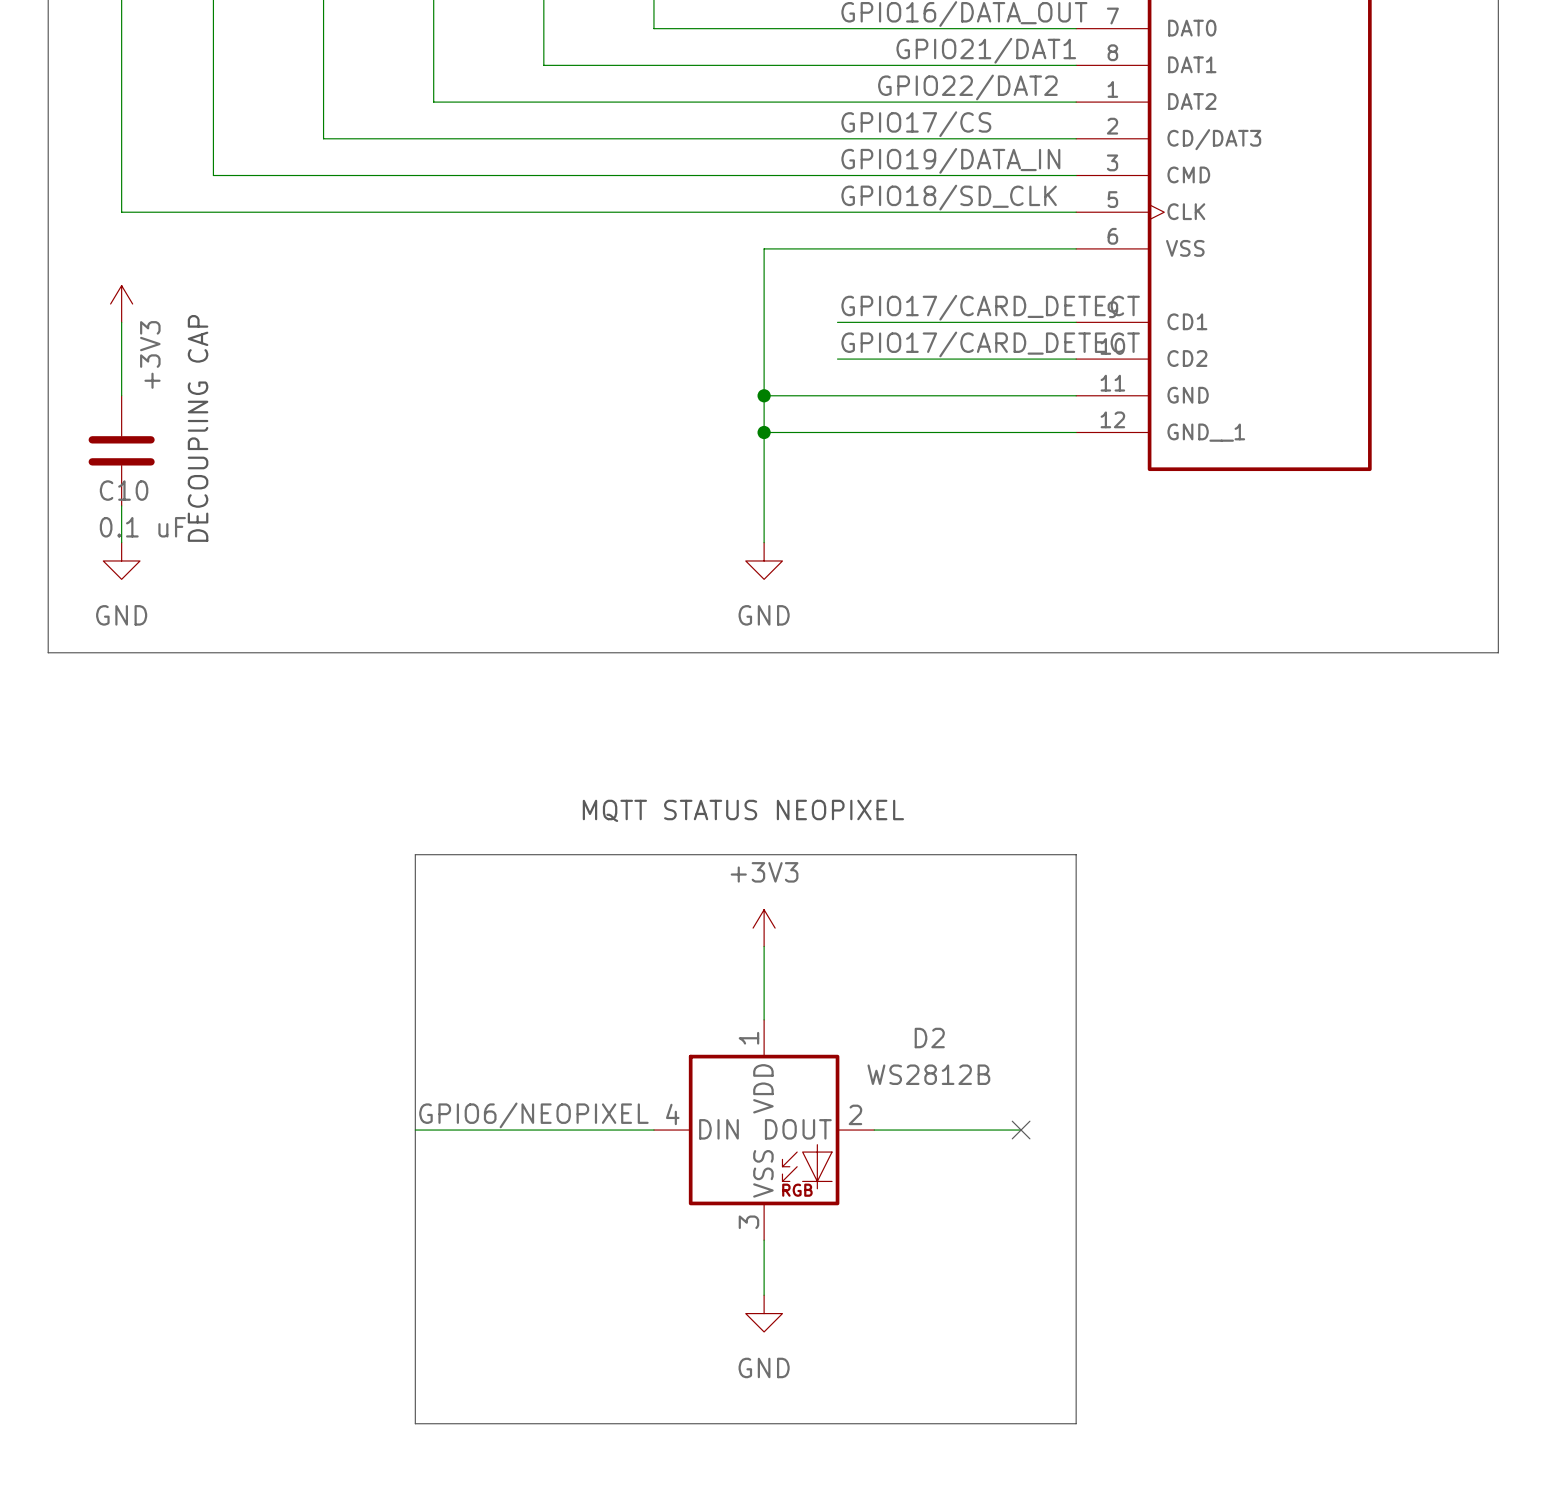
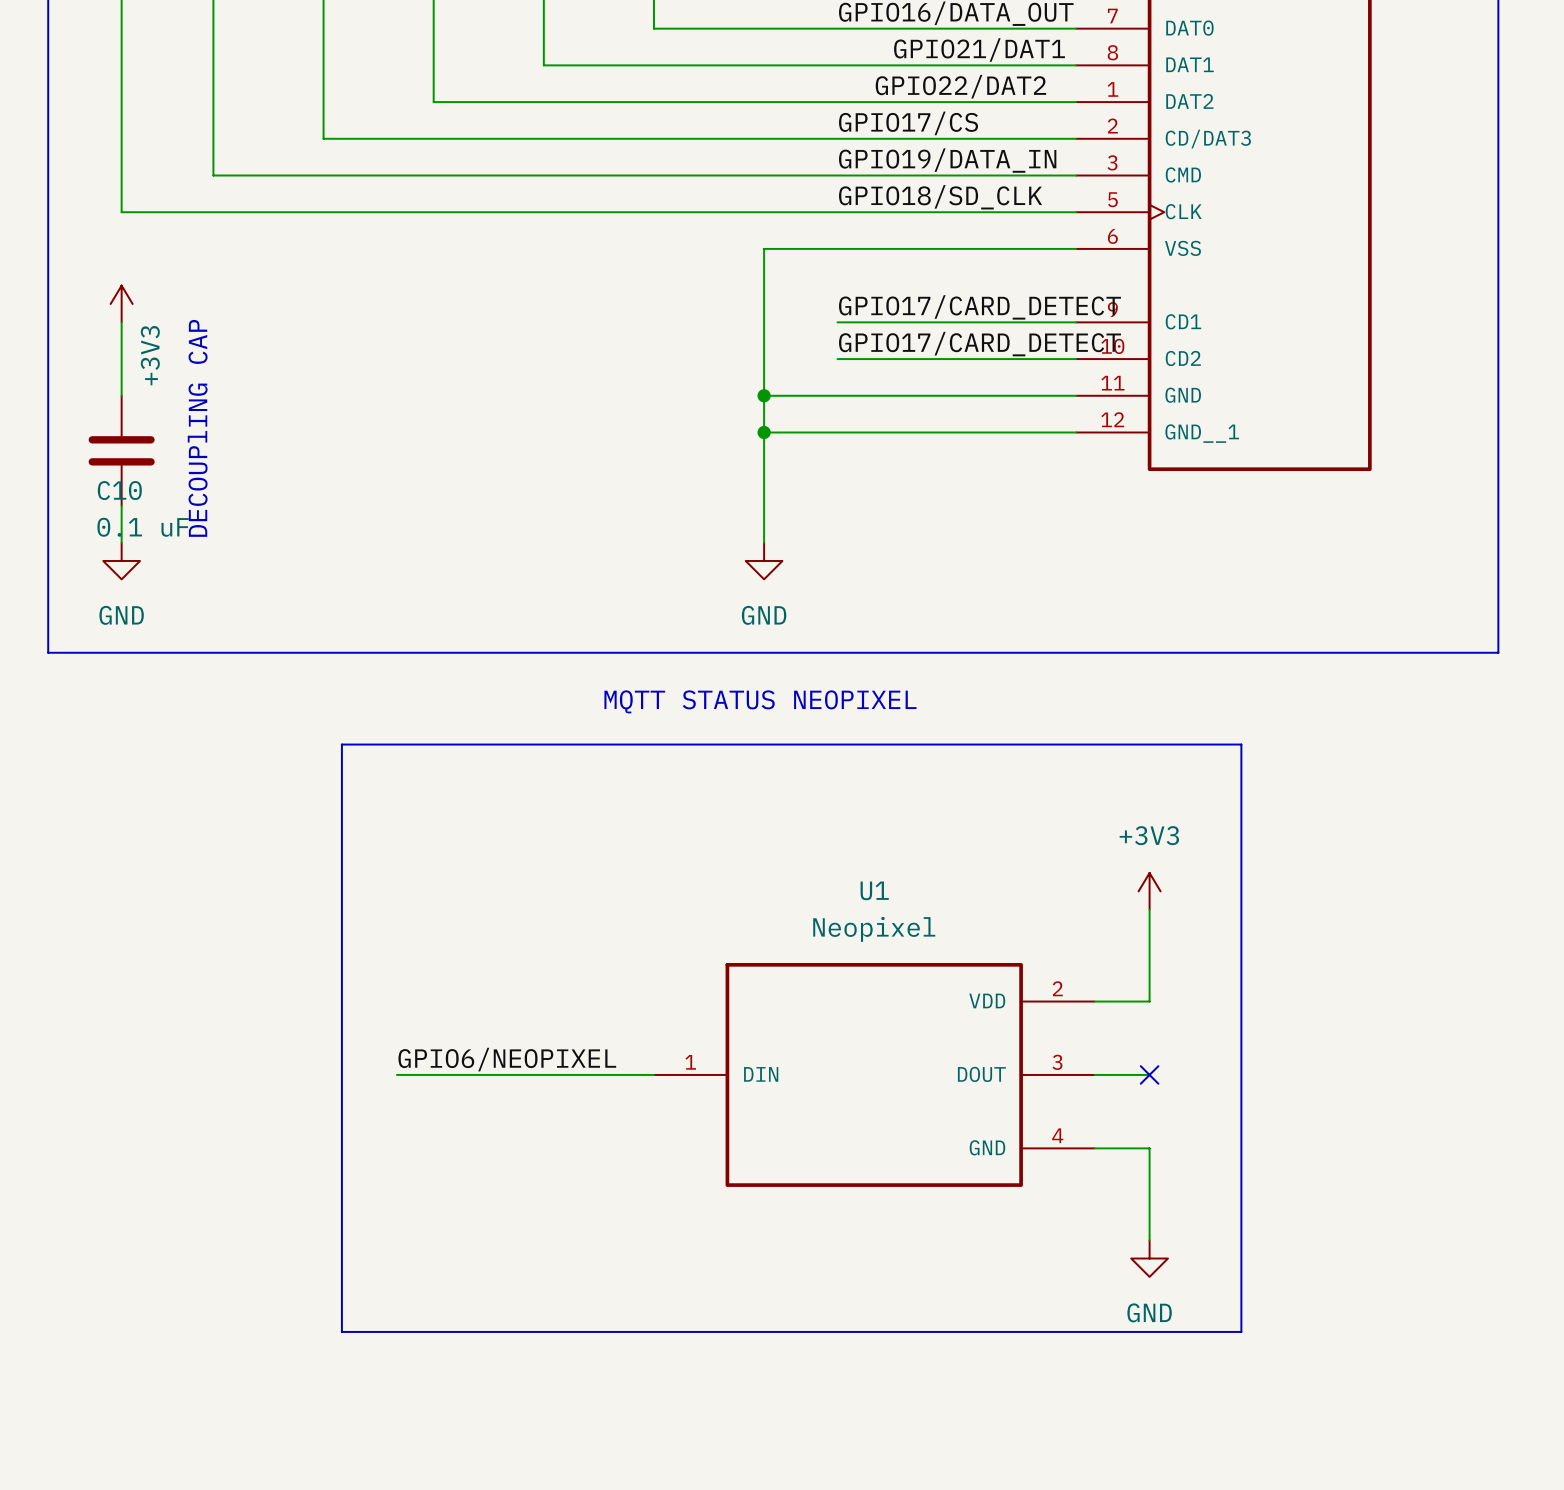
text position: MQTT STATUS NEOPIXEL (743, 810) -> MQTT STATUS NEOPIXEL (760, 701)
line: (415, 854) (1076, 854) (1076, 1423) (415, 1423) (415, 854) -> (341, 744) (341, 1331) (1241, 1331) (1241, 744) (341, 744)
power symbol: none -> +3V3 (1149, 891)
wire: none -> (1149, 909) (1149, 1001) (1094, 1001)
power symbol: +3V3 (764, 928) -> none
wire: (764, 946) (764, 1019) -> none
wire: none -> (396, 1074) (653, 1074)
U1: none -> Neopixel (874, 1074)
wire: none -> (1094, 1074) (1149, 1074)
no-connect mark: none -> (1149, 1074)
label position: GPIO6/NEOPIXEL (533, 1115) -> GPIO6/NEOPIXEL (507, 1059)
wire: (415, 1130) (653, 1130) -> none
D2: WS2812B (764, 1130) -> none
wire: (874, 1130) (1021, 1130) -> none
no-connect mark: (1021, 1130) -> none
wire: none -> (1094, 1148) (1149, 1148) (1149, 1240)
wire: (764, 1240) (764, 1295) -> none
power symbol: none -> GND (1149, 1258)
power symbol: GND (764, 1313) -> none

